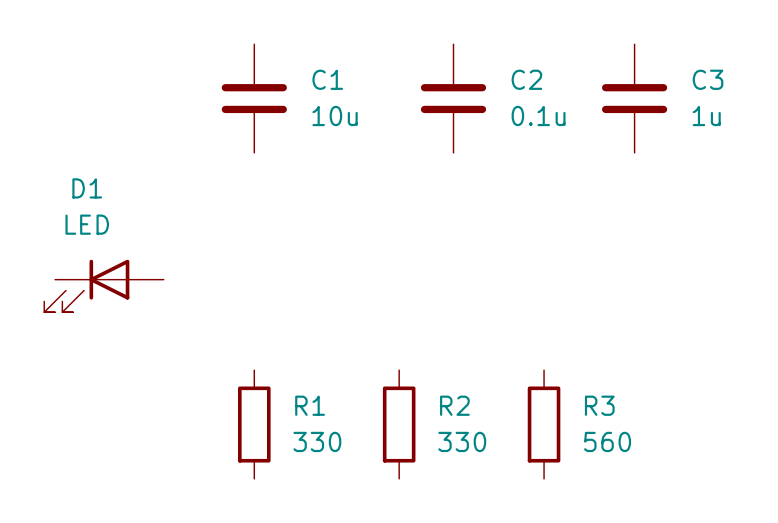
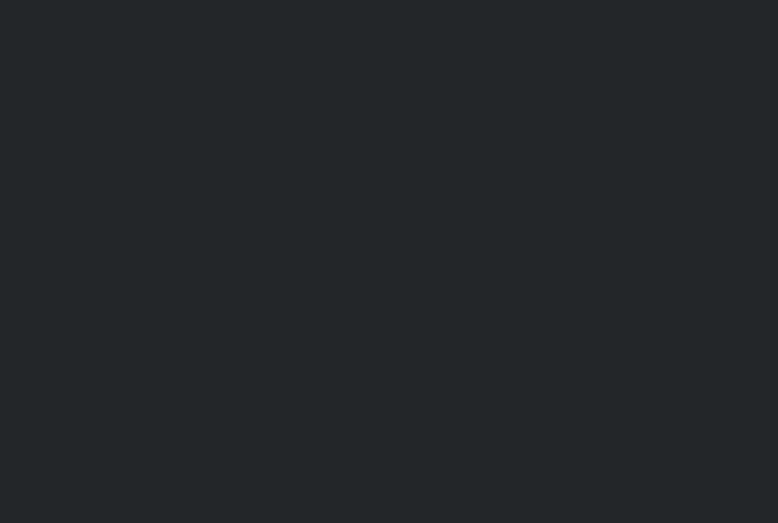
C1: 10u (254, 98) -> none
C2: 0.1u (453, 98) -> none
C3: 1u (634, 98) -> none
D1: LED (104, 285) -> none
R1: 330 (254, 424) -> none
R2: 330 (399, 424) -> none
R3: 560 (544, 424) -> none

